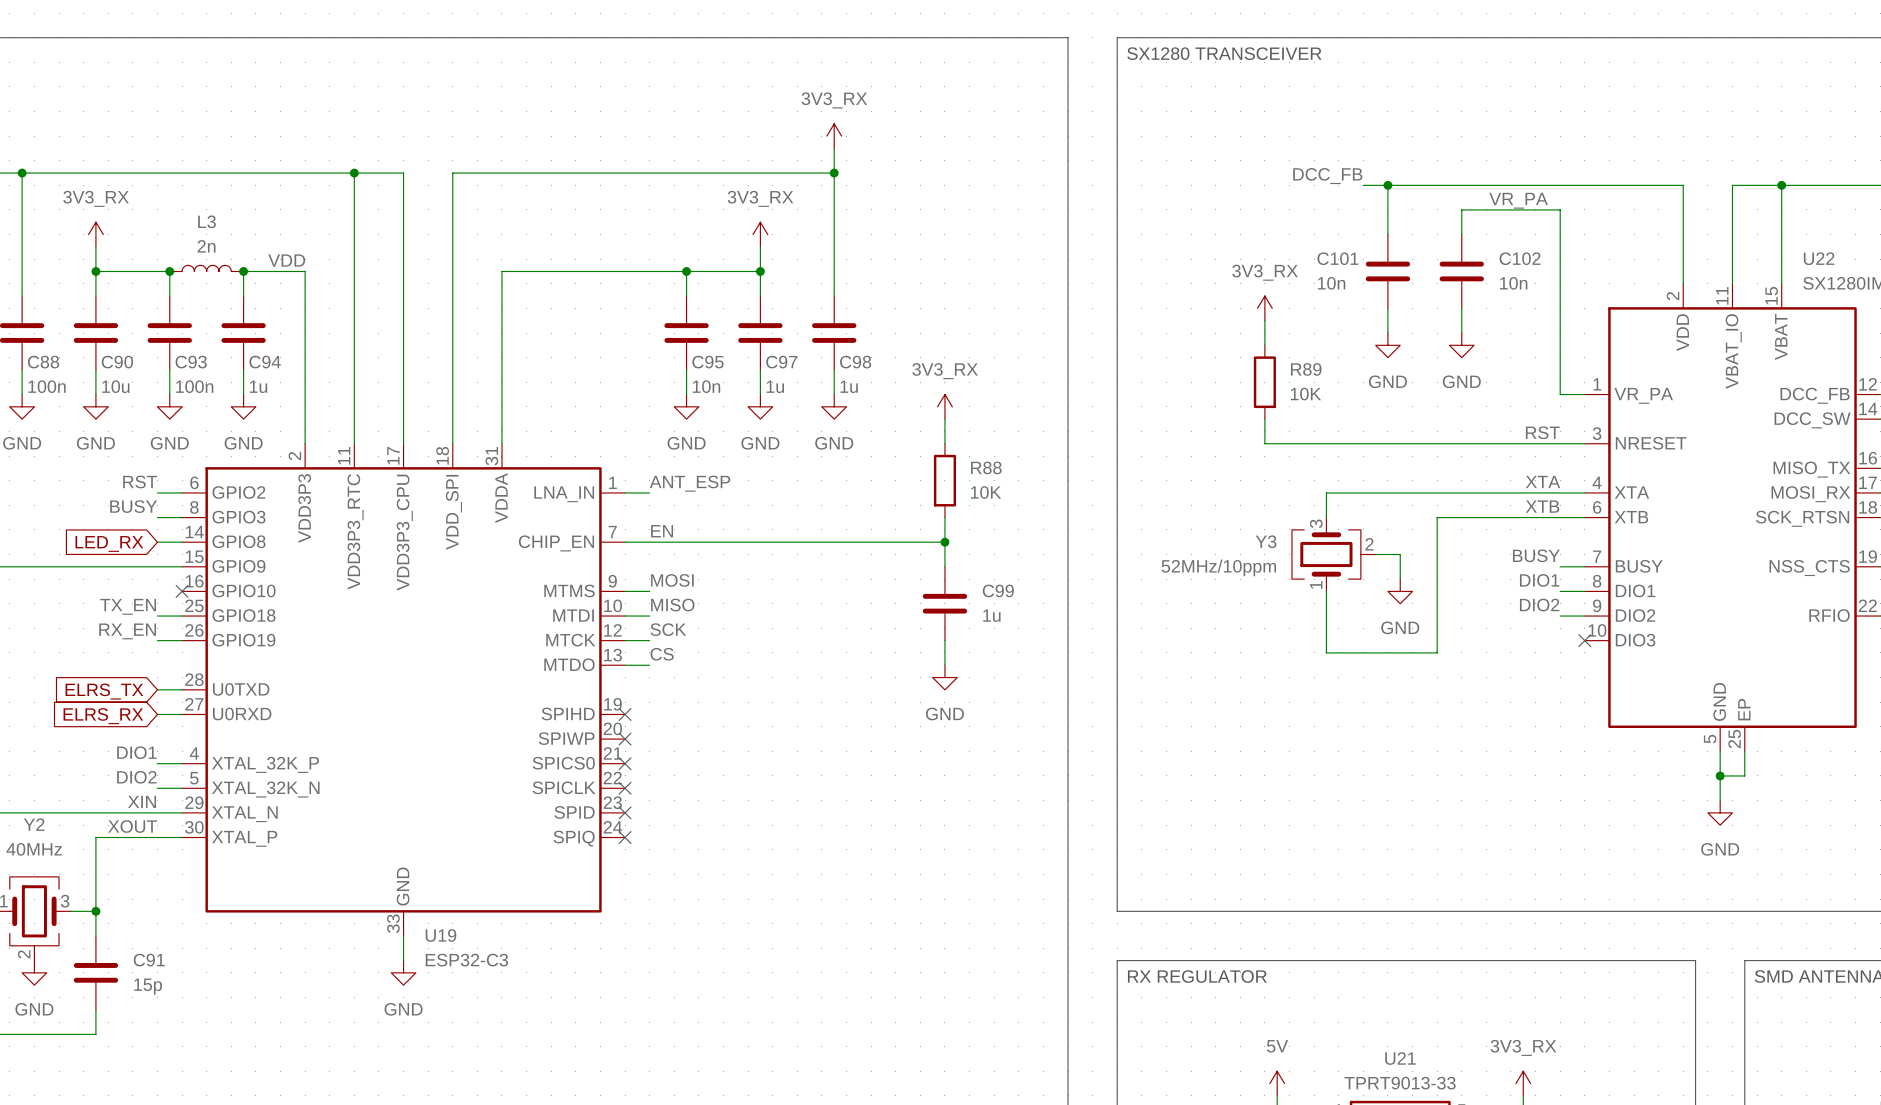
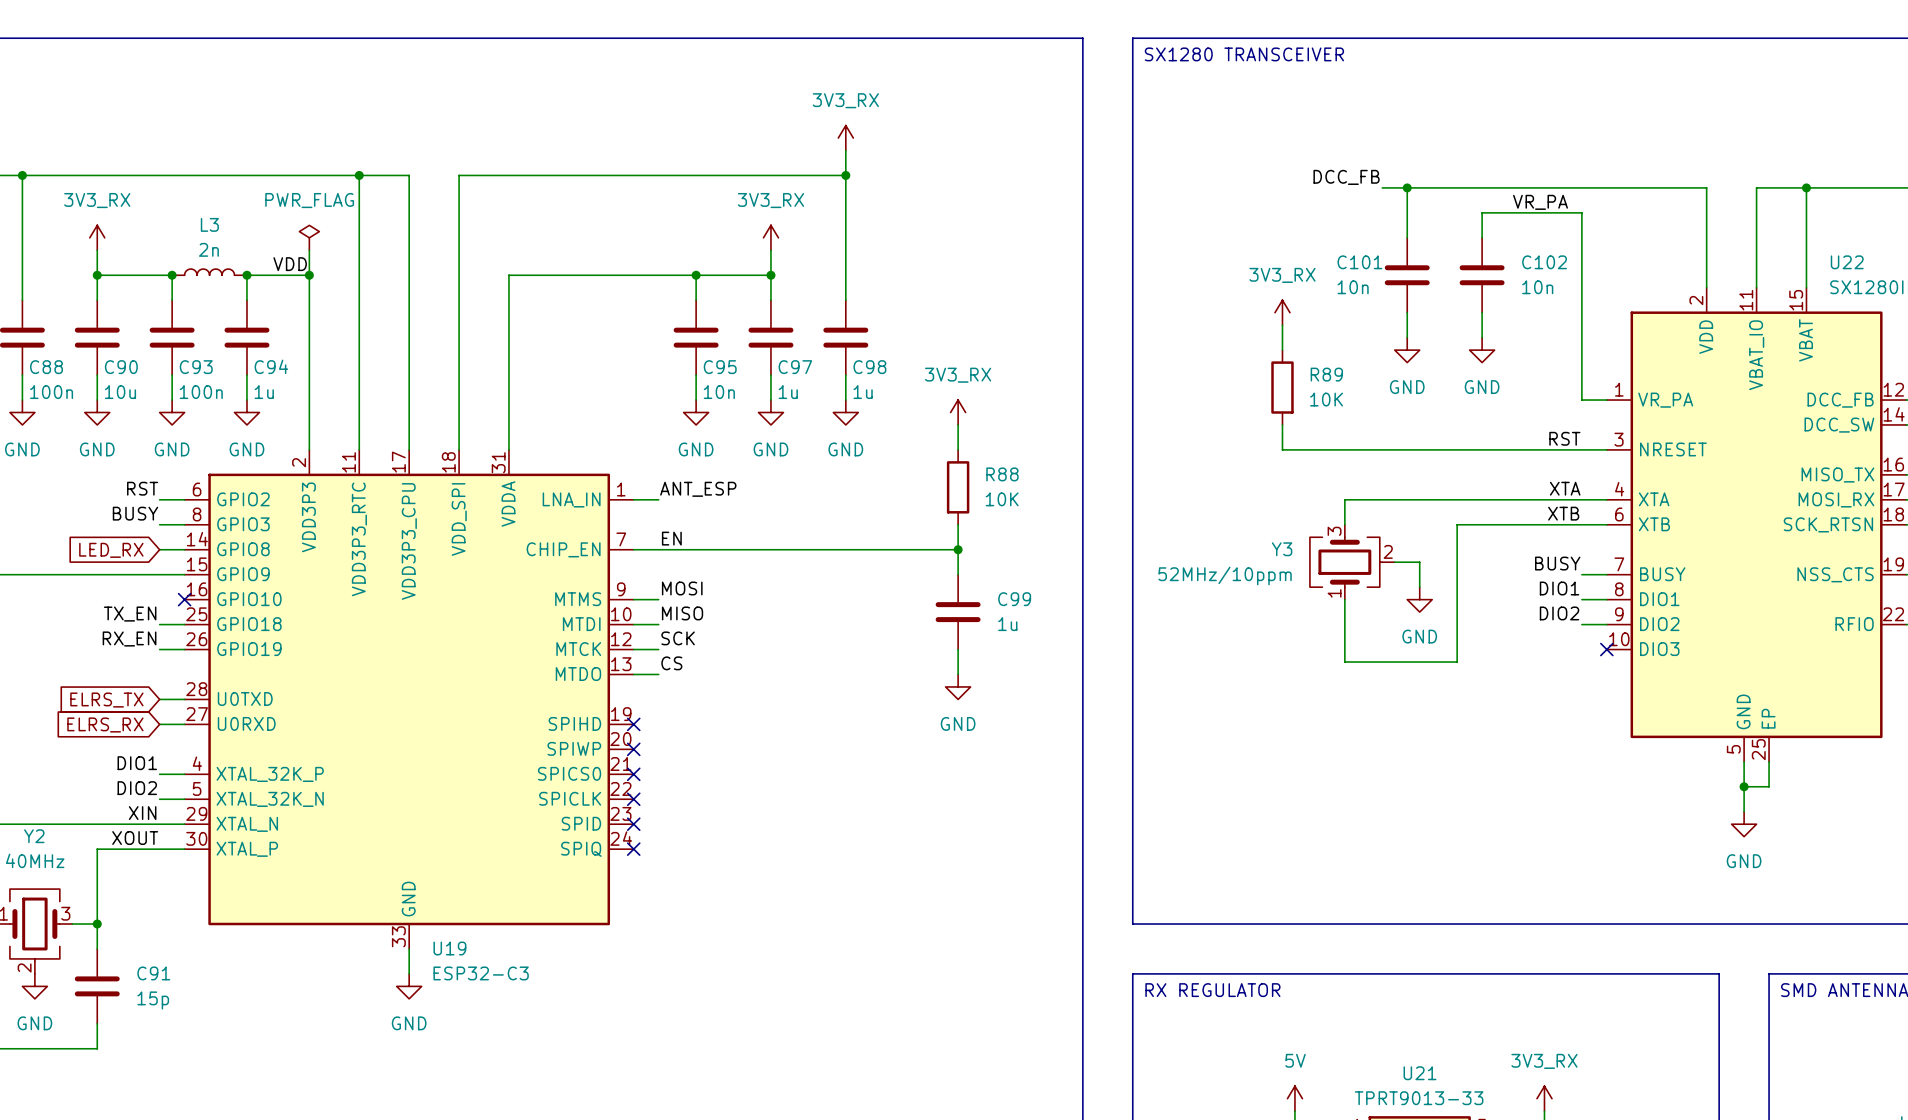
power symbol: none -> PWR_FLAG (309, 237)
wire: none -> (309, 250) (309, 275)
junction: none -> (309, 275)

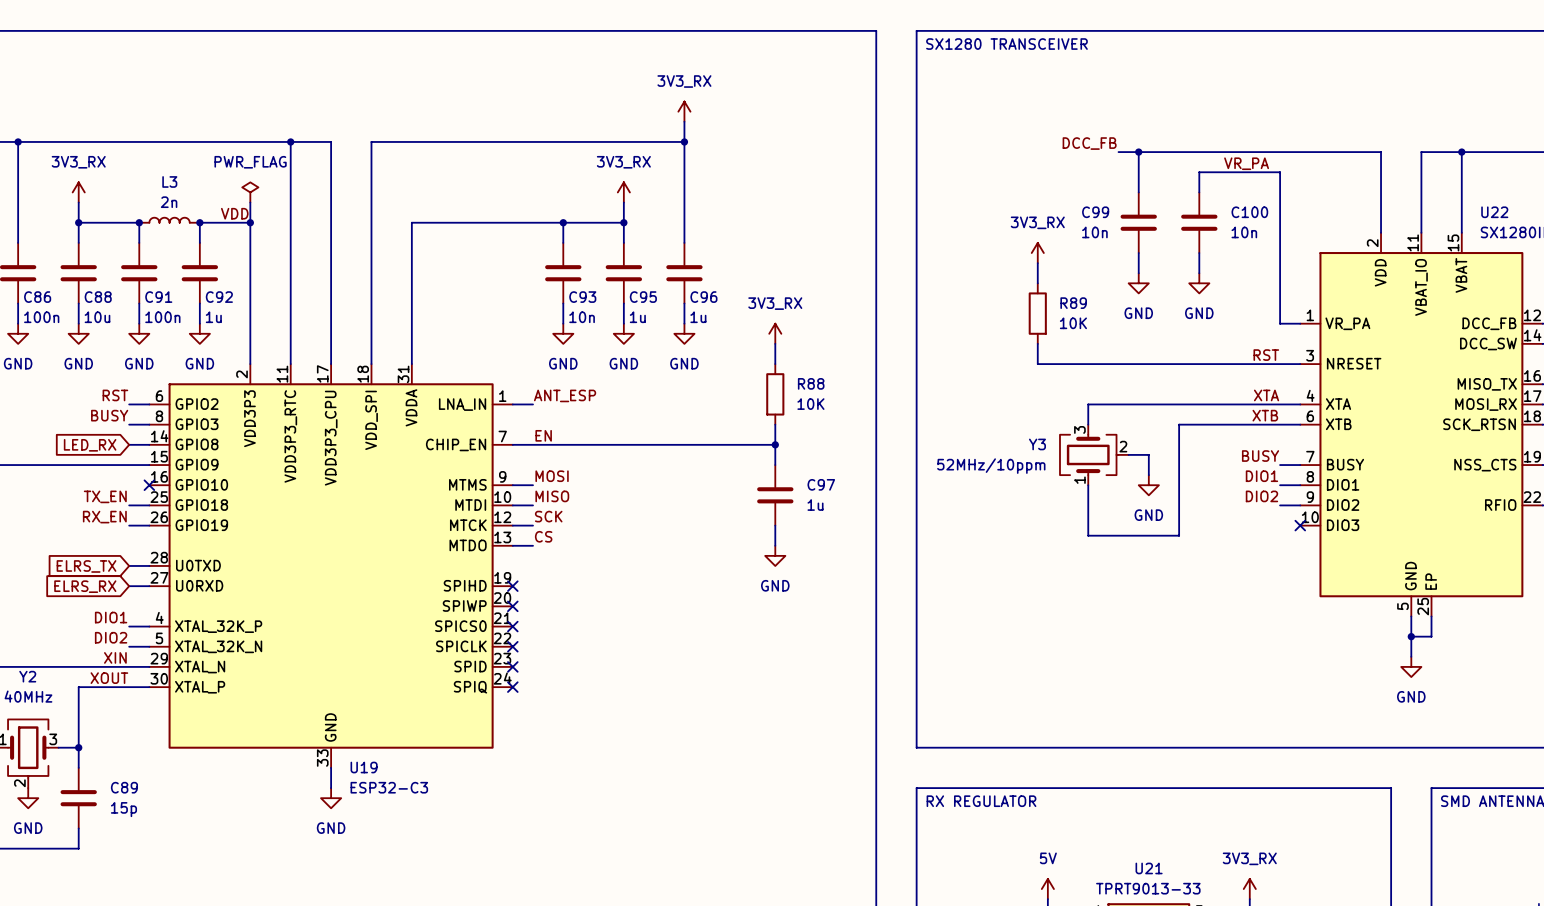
C101 name: C101 (1359, 262) -> C99 (1095, 212)
C102 name: C102 (1544, 262) -> C100 (1249, 212)
C94 name: C94 (271, 366) -> C92 (219, 297)
C88 name: C88 (46, 367) -> C86 (37, 297)
C90 name: C90 (121, 367) -> C88 (98, 297)
C93 name: C93 (196, 367) -> C91 (158, 297)
C95 name: C95 (720, 367) -> C93 (582, 297)
C97 name: C97 (795, 367) -> C95 (643, 297)
C98 name: C98 (869, 367) -> C96 (703, 297)
C99 name: C99 (1014, 599) -> C97 (821, 484)
C91 name: C91 (153, 973) -> C89 (124, 787)

